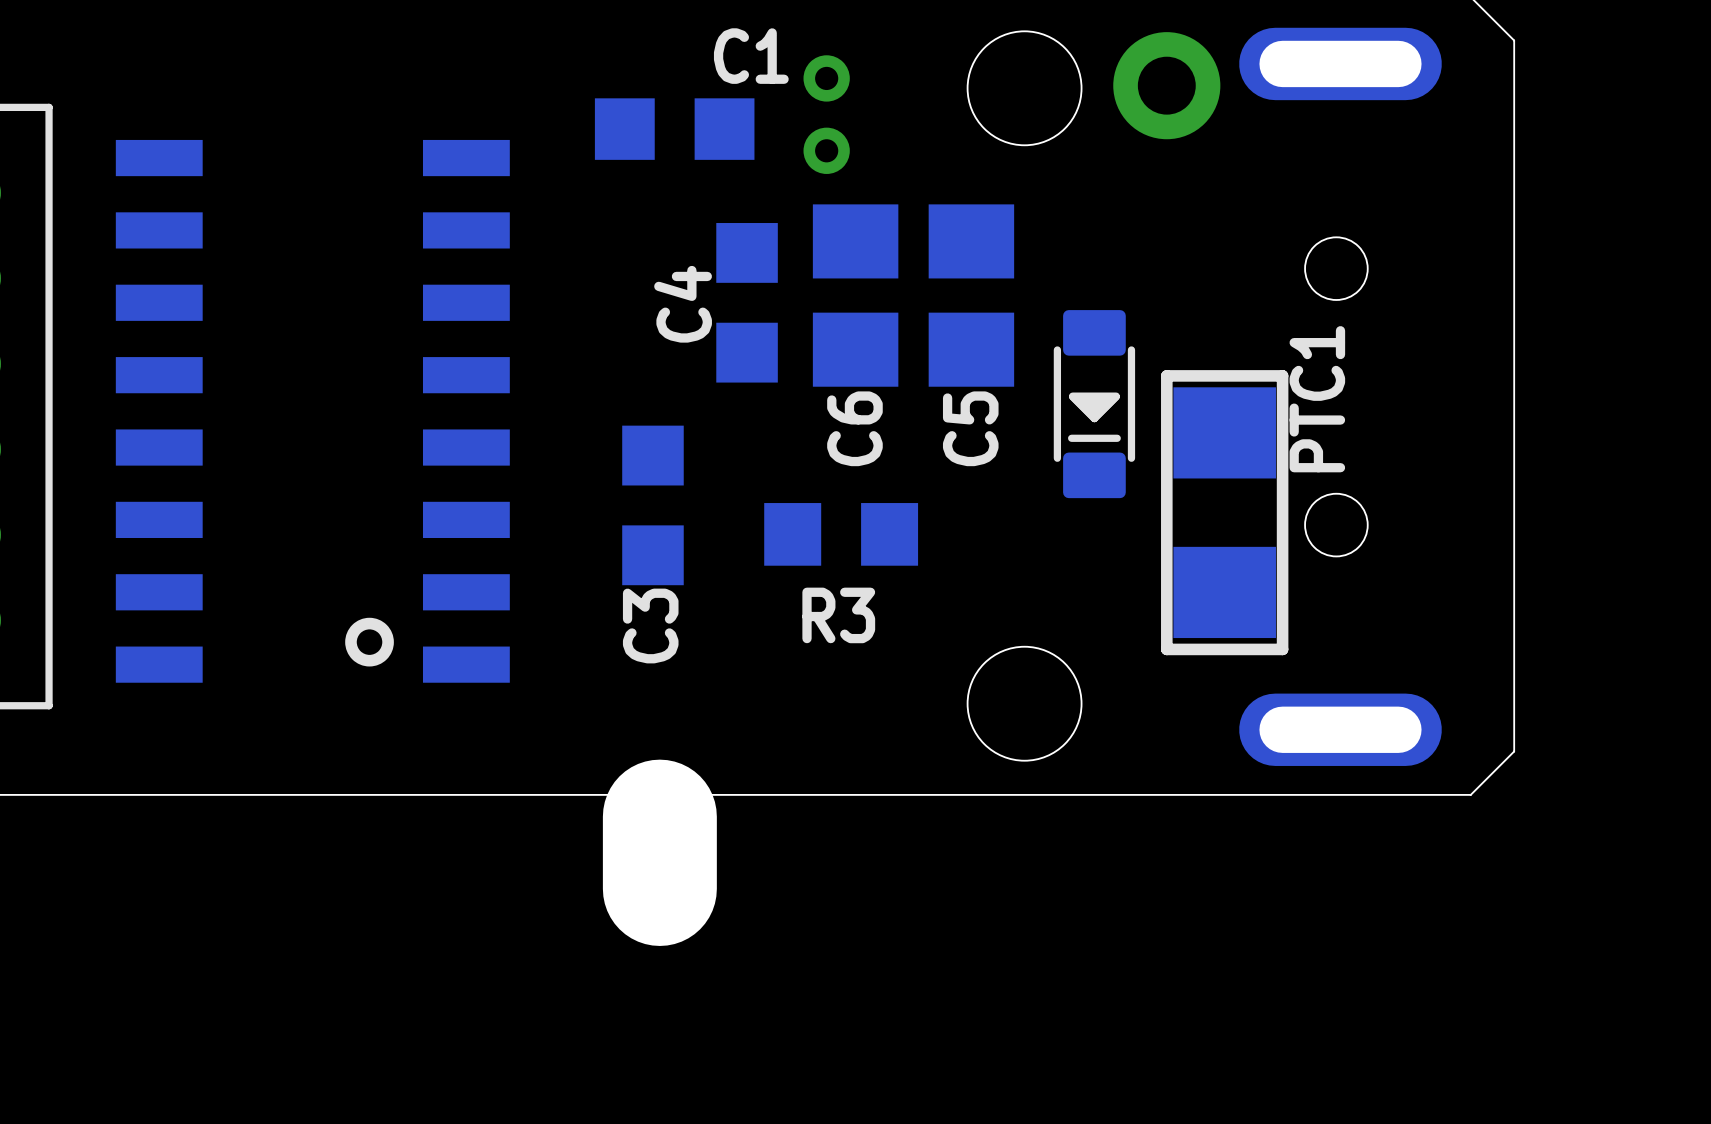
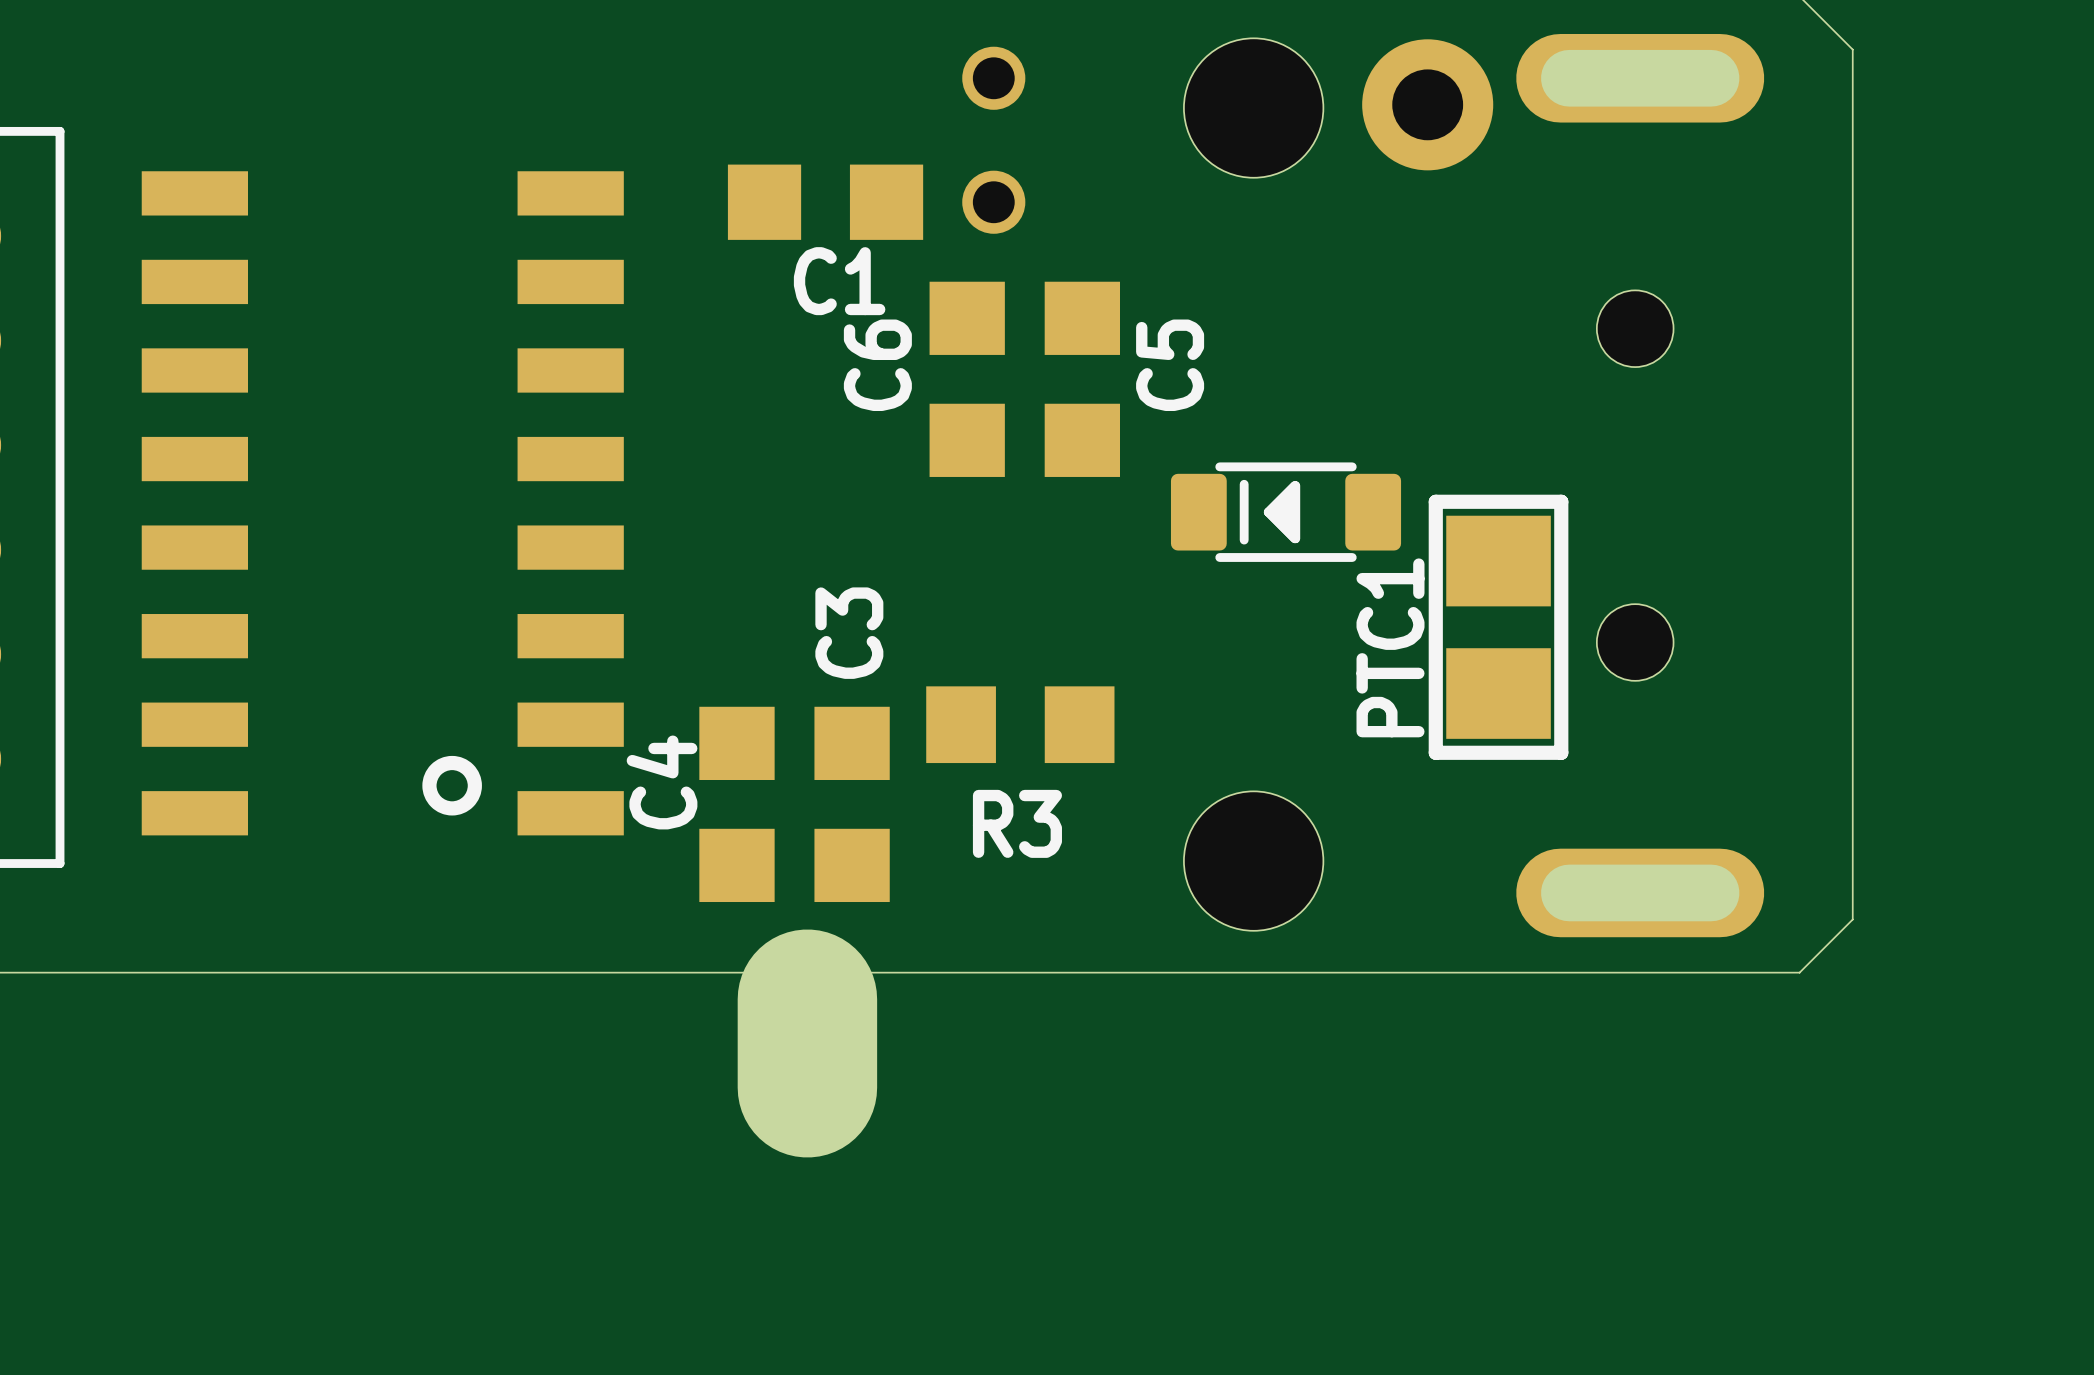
part footprint: [803, 55, 850, 174] -> [962, 46, 1026, 234]
C1 name position: C1 (751, 56) -> C1 (839, 281)
C1 position: (674, 129) -> (825, 202)
C6 footprint: [812, 204, 899, 387] -> [929, 281, 1005, 477]
C5 footprint: [928, 204, 1015, 387] -> [1044, 281, 1120, 477]
C4 position: (747, 302) -> (736, 804)
C4 name position: C4 (683, 304) -> C4 (662, 782)
PTC1 footprint: [1161, 370, 1289, 656] -> [1428, 494, 1569, 760]
PTC1 name position: PTC1 (1317, 399) -> PTC1 (1390, 647)
part rotation: 0° (1094, 404) -> 90° clockwise (1286, 512)
C6 name position: C6 (854, 428) -> C6 (877, 365)
C5 name position: C5 (970, 428) -> C5 (1170, 365)
C3 position: (652, 505) -> (852, 804)
R3 position: (841, 534) -> (1020, 724)
C3 name position: C3 (650, 626) -> C3 (849, 633)

